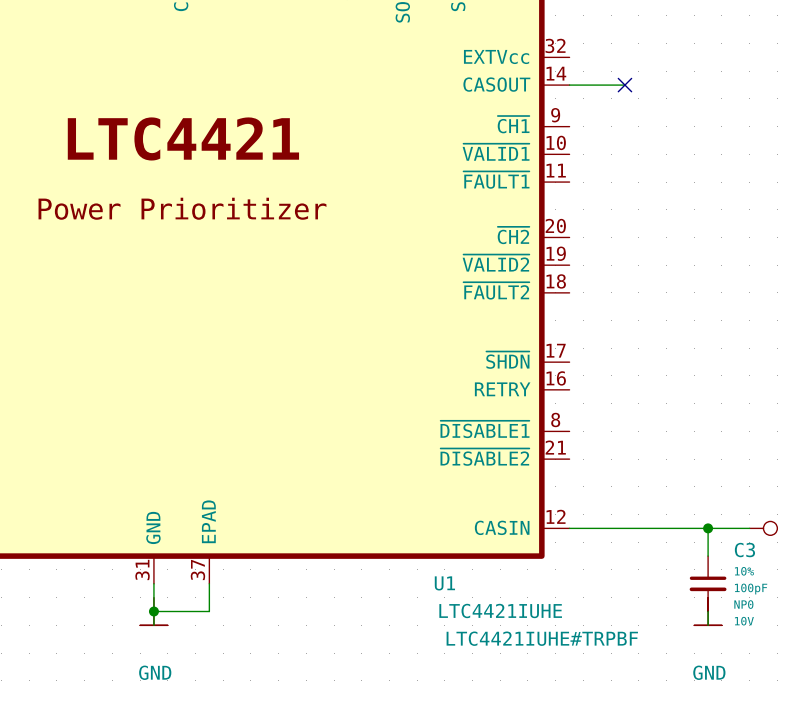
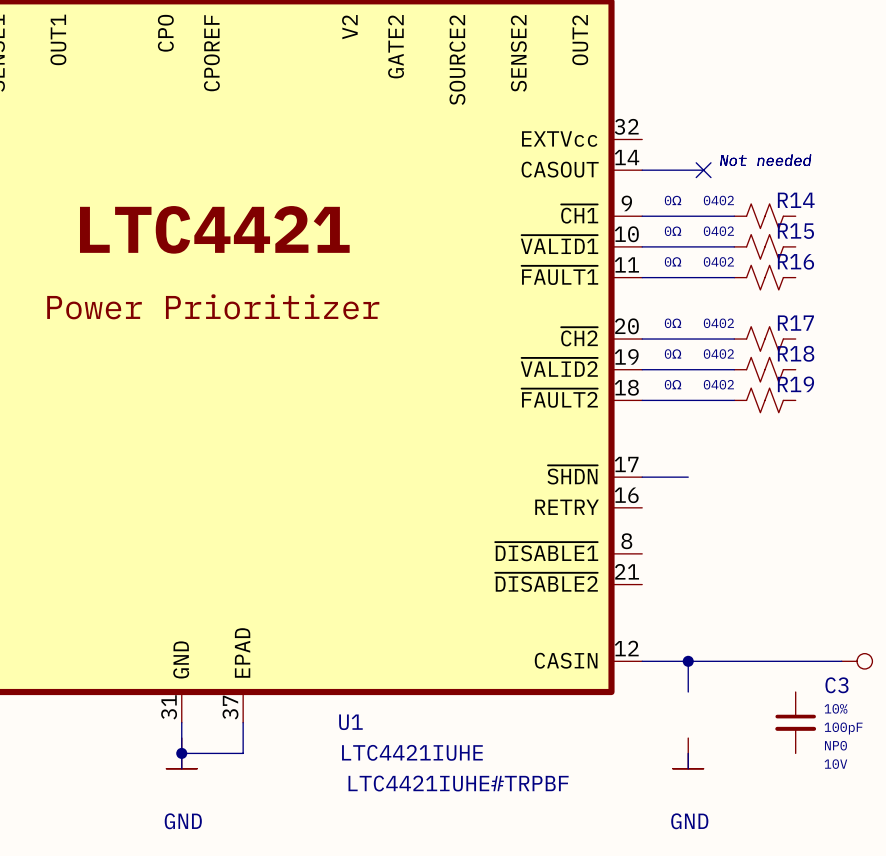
text: none -> Not needed (765, 160)
wire: none -> (642, 216) (734, 216)
R14: none -> (764, 216)
wire: none -> (642, 246) (734, 246)
R15: none -> (764, 246)
wire: none -> (642, 277) (734, 277)
R16: none -> (764, 277)
wire: none -> (642, 339) (734, 339)
R17: none -> (764, 339)
wire: none -> (642, 369) (734, 369)
R18: none -> (764, 369)
wire: none -> (642, 400) (734, 400)
R19: none -> (764, 400)
wire: none -> (642, 477) (688, 477)
junction: none -> (688, 661)
wire: (708, 528) (708, 556) -> (688, 661) (688, 692)
junction: (708, 528) -> none
U1 name position: U1 (444, 583) -> U1 (350, 722)
U1 value position: LTC4421IUHE (500, 610) -> LTC4421IUHE (412, 752)
wire: (708, 611) (708, 625) -> (688, 753) (688, 768)
power symbol position: GND (708, 611) -> GND (688, 753)
U1 text position: LTC4421IUHE#TRPBF (542, 638) -> LTC4421IUHE#TRPBF (458, 783)

